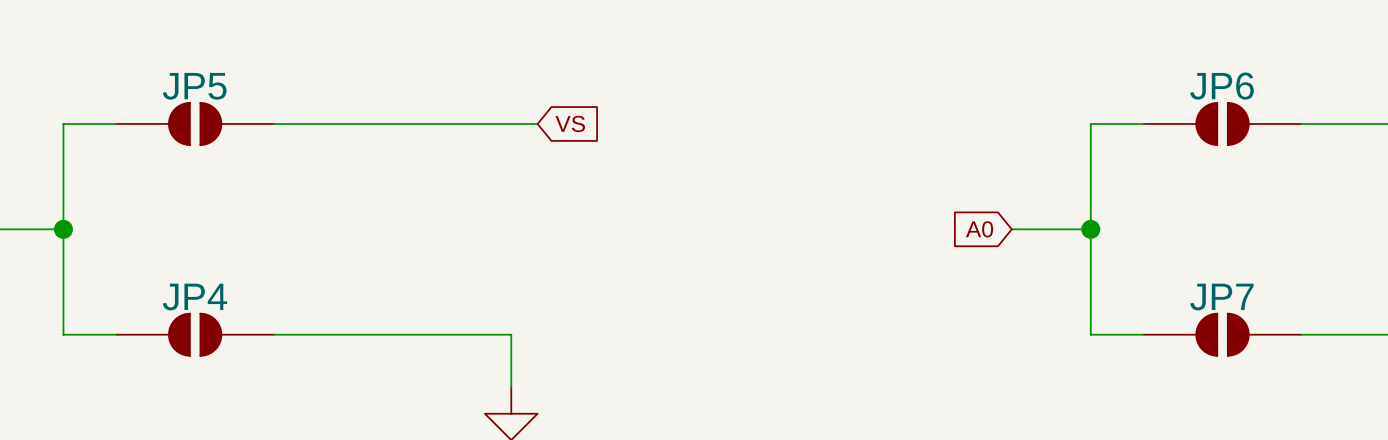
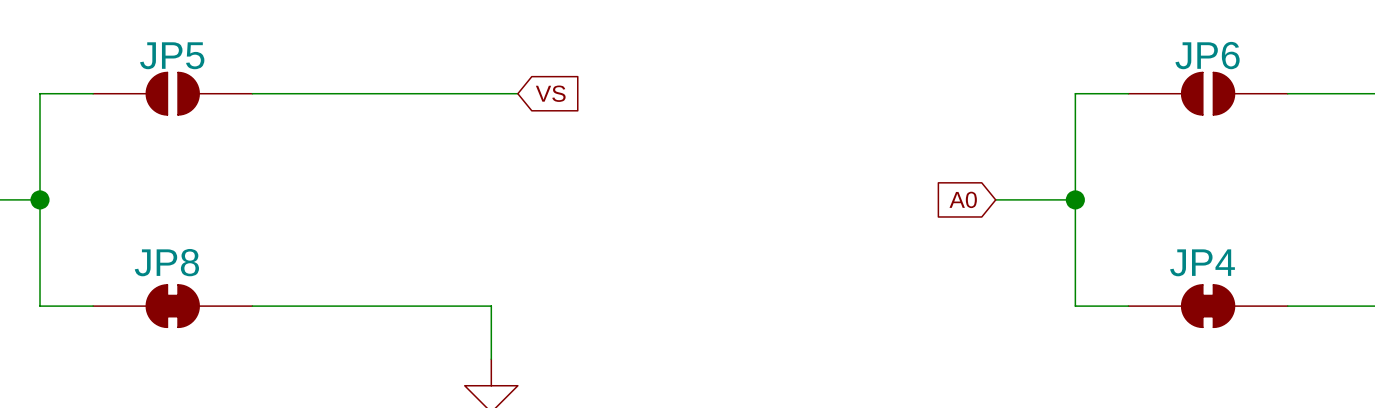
JP4 symbol: [116, 313, 275, 356] -> [1128, 284, 1288, 328]
JP8: none -> (172, 306)
JP7: (1222, 334) -> none

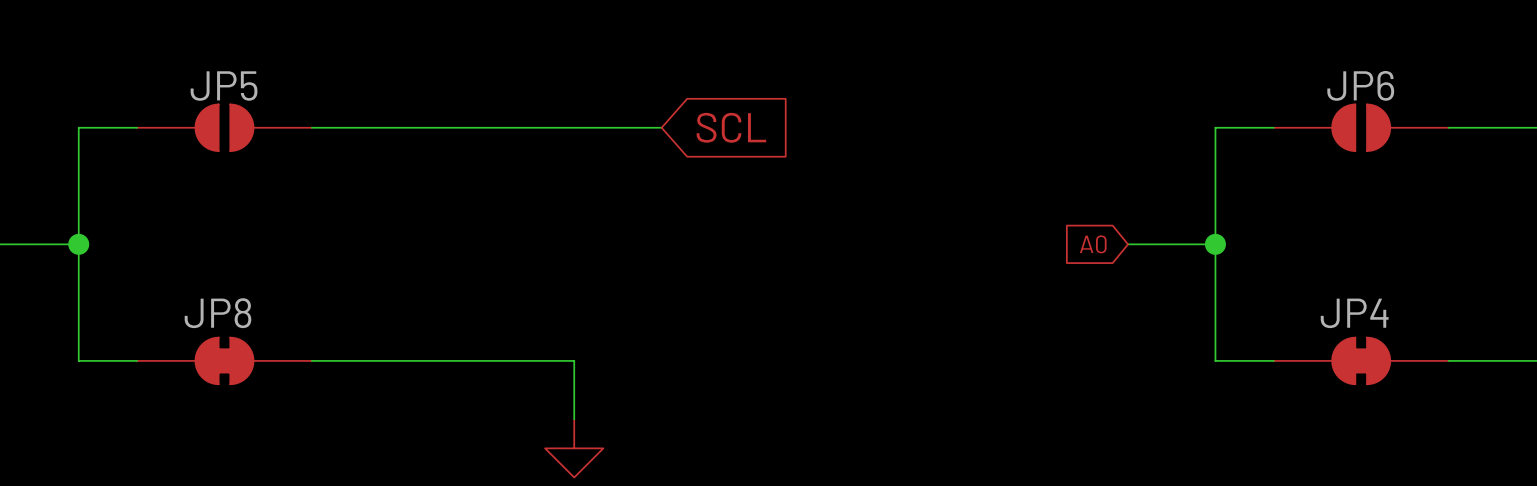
wire: none -> (603, 127) (661, 127)
global label: VS (550, 93) -> none
global label: none -> SCL (731, 127)

